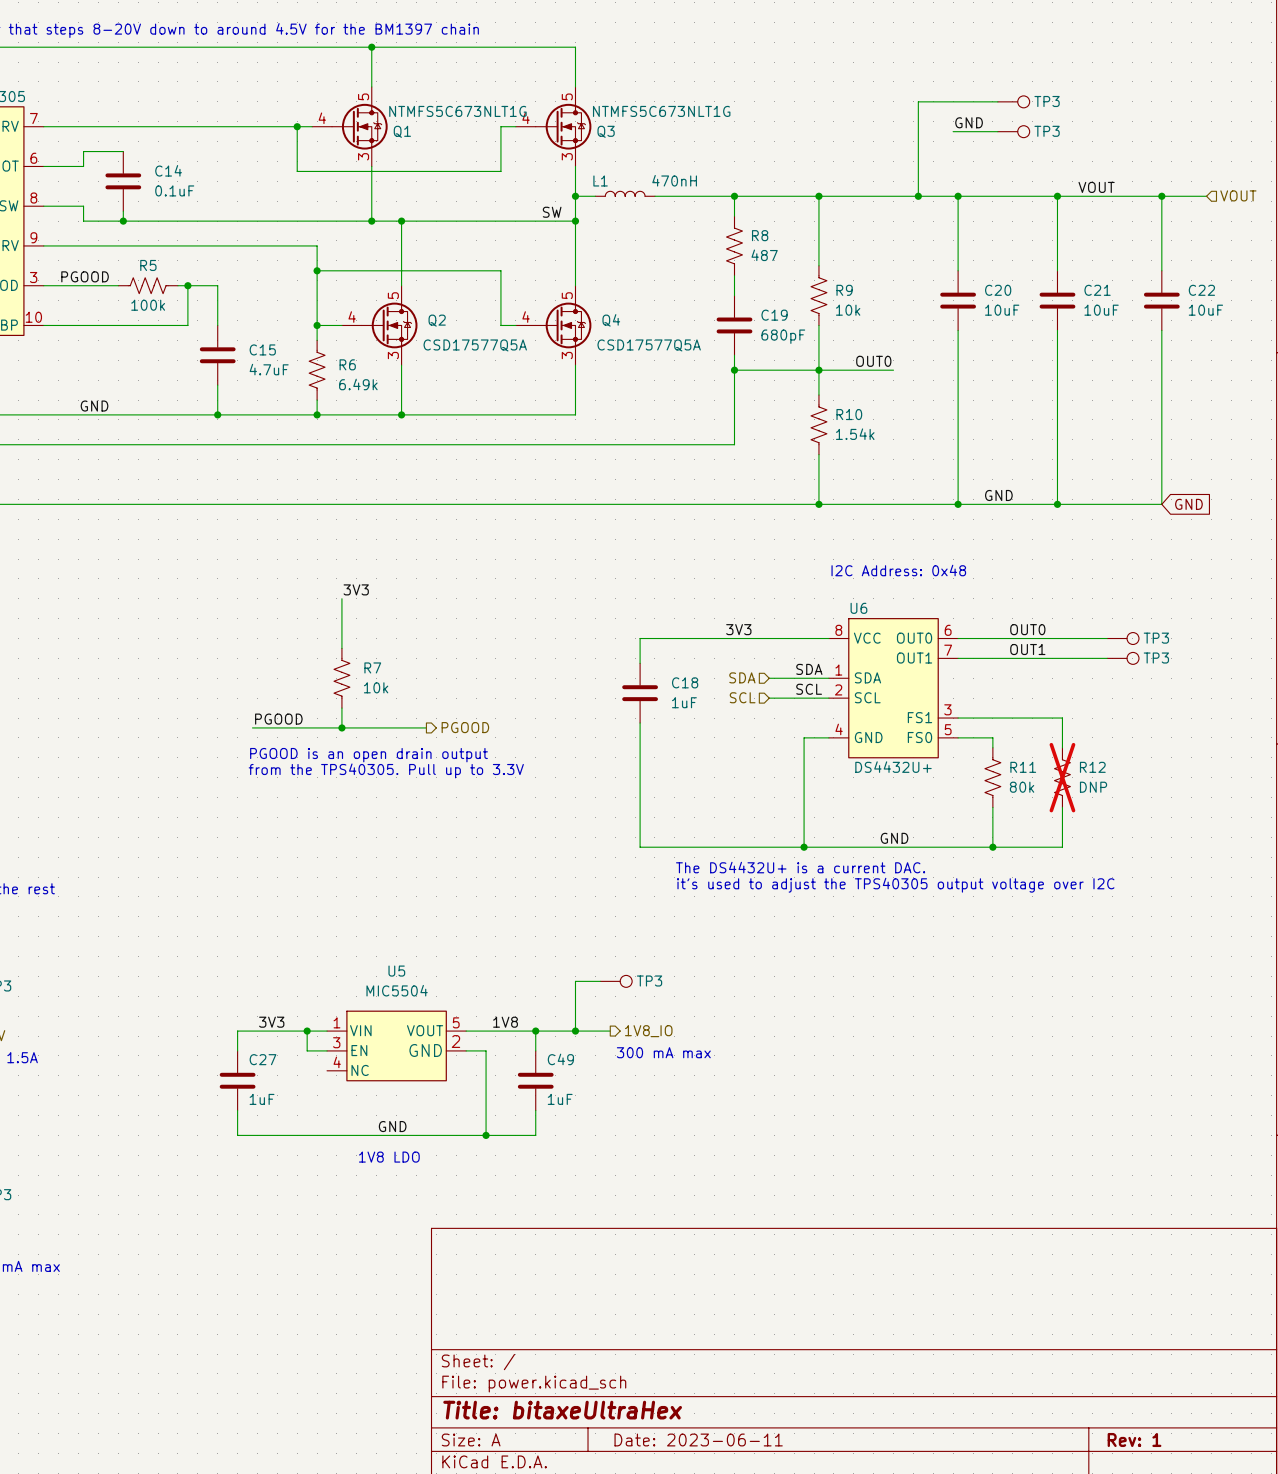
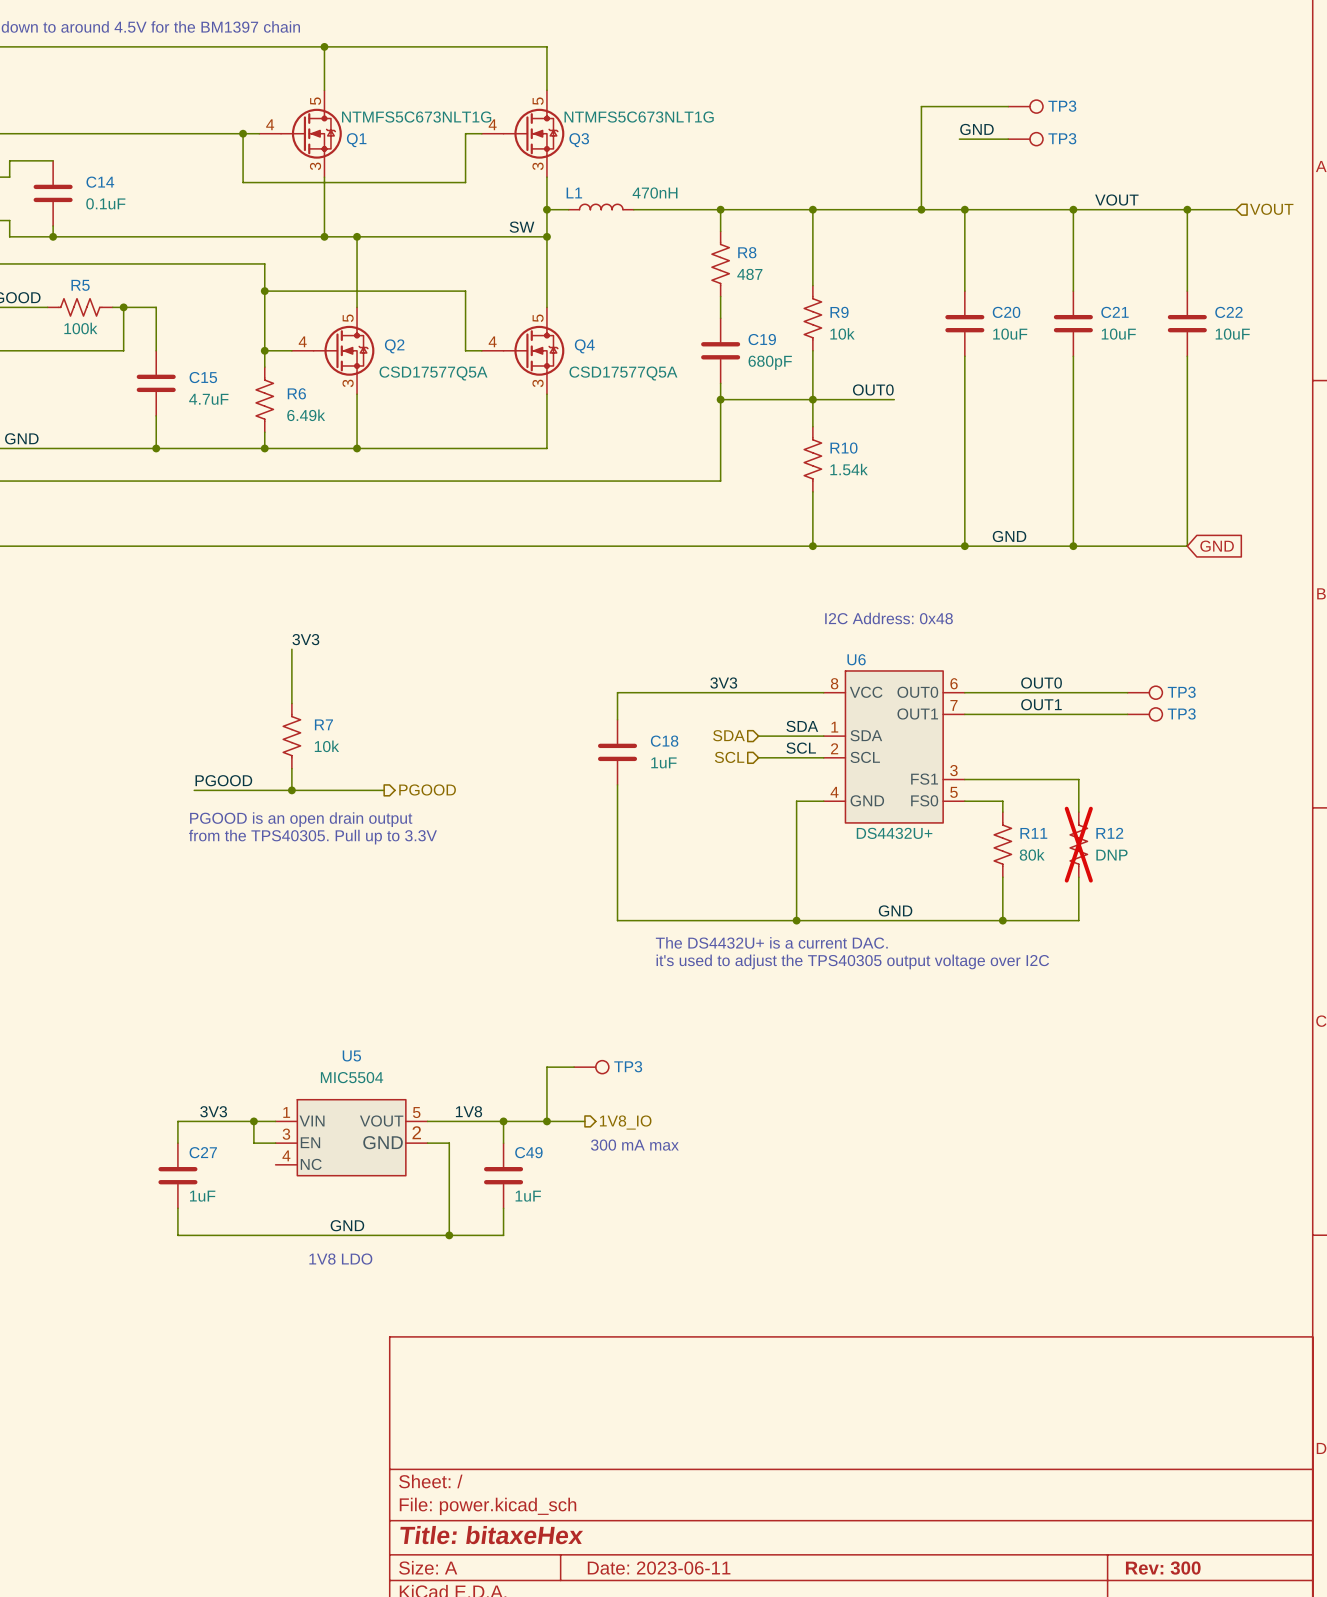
title block: Title: bitaxeUltraHex (562, 1410) -> Title: bitaxeHex (491, 1535)
title block: Rev: 1 (1134, 1440) -> Rev: 300 (1163, 1568)

